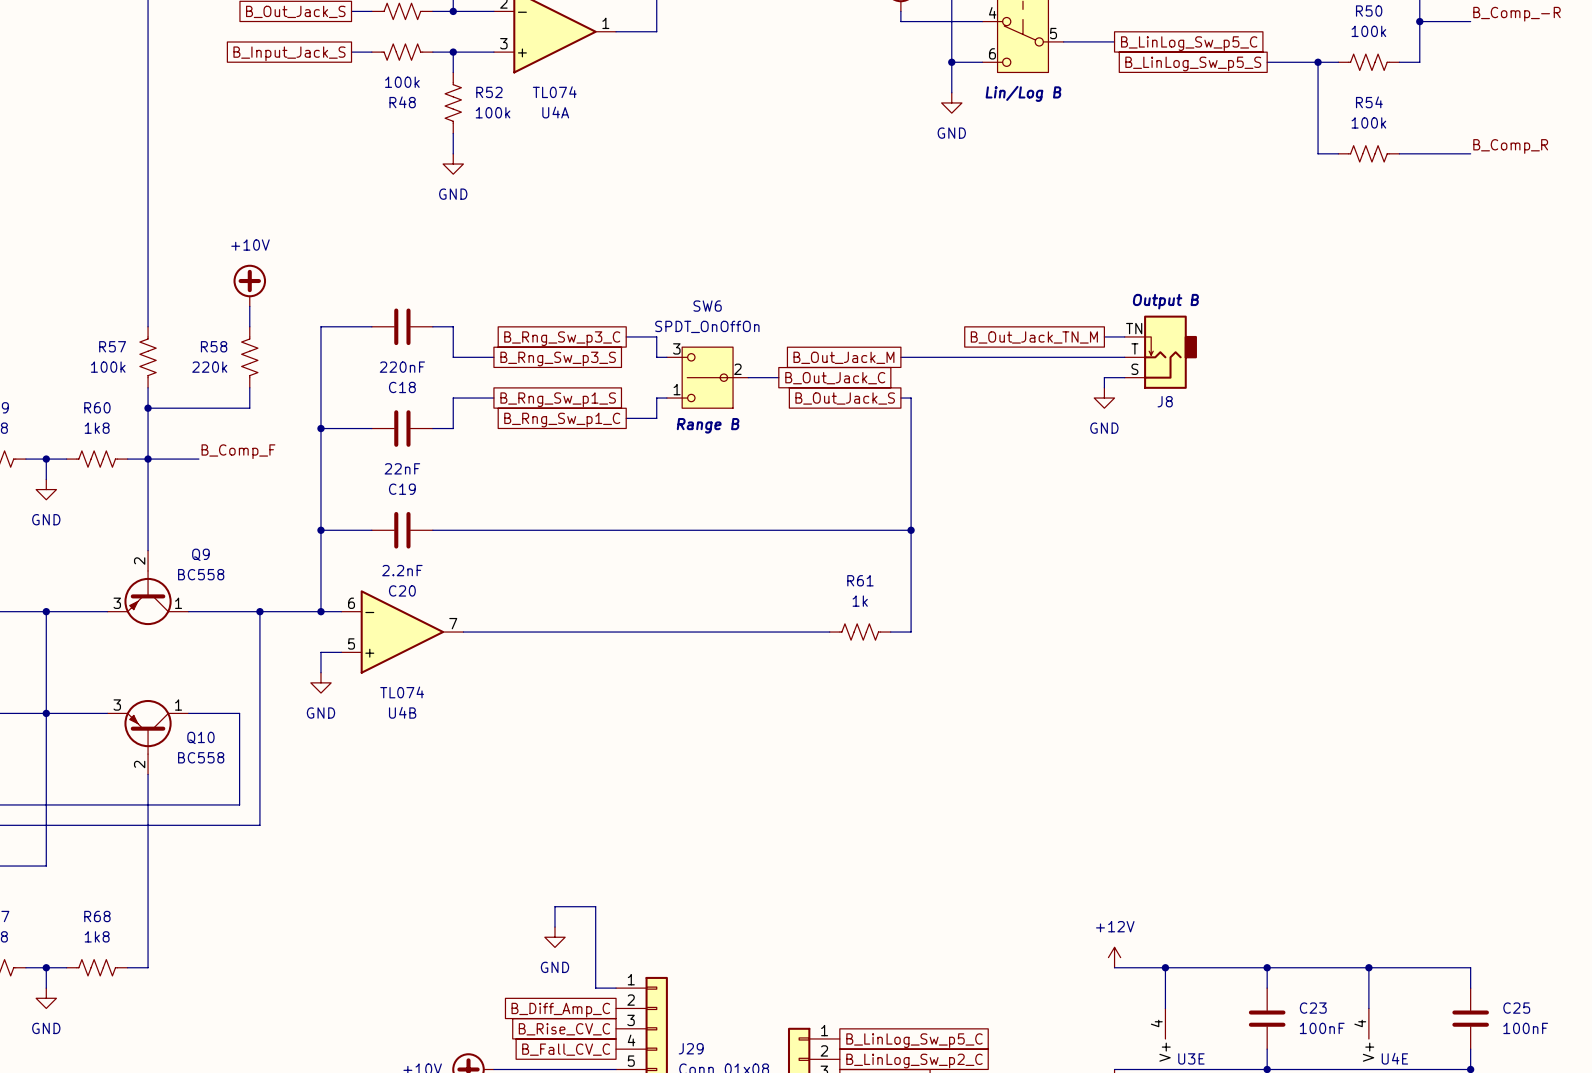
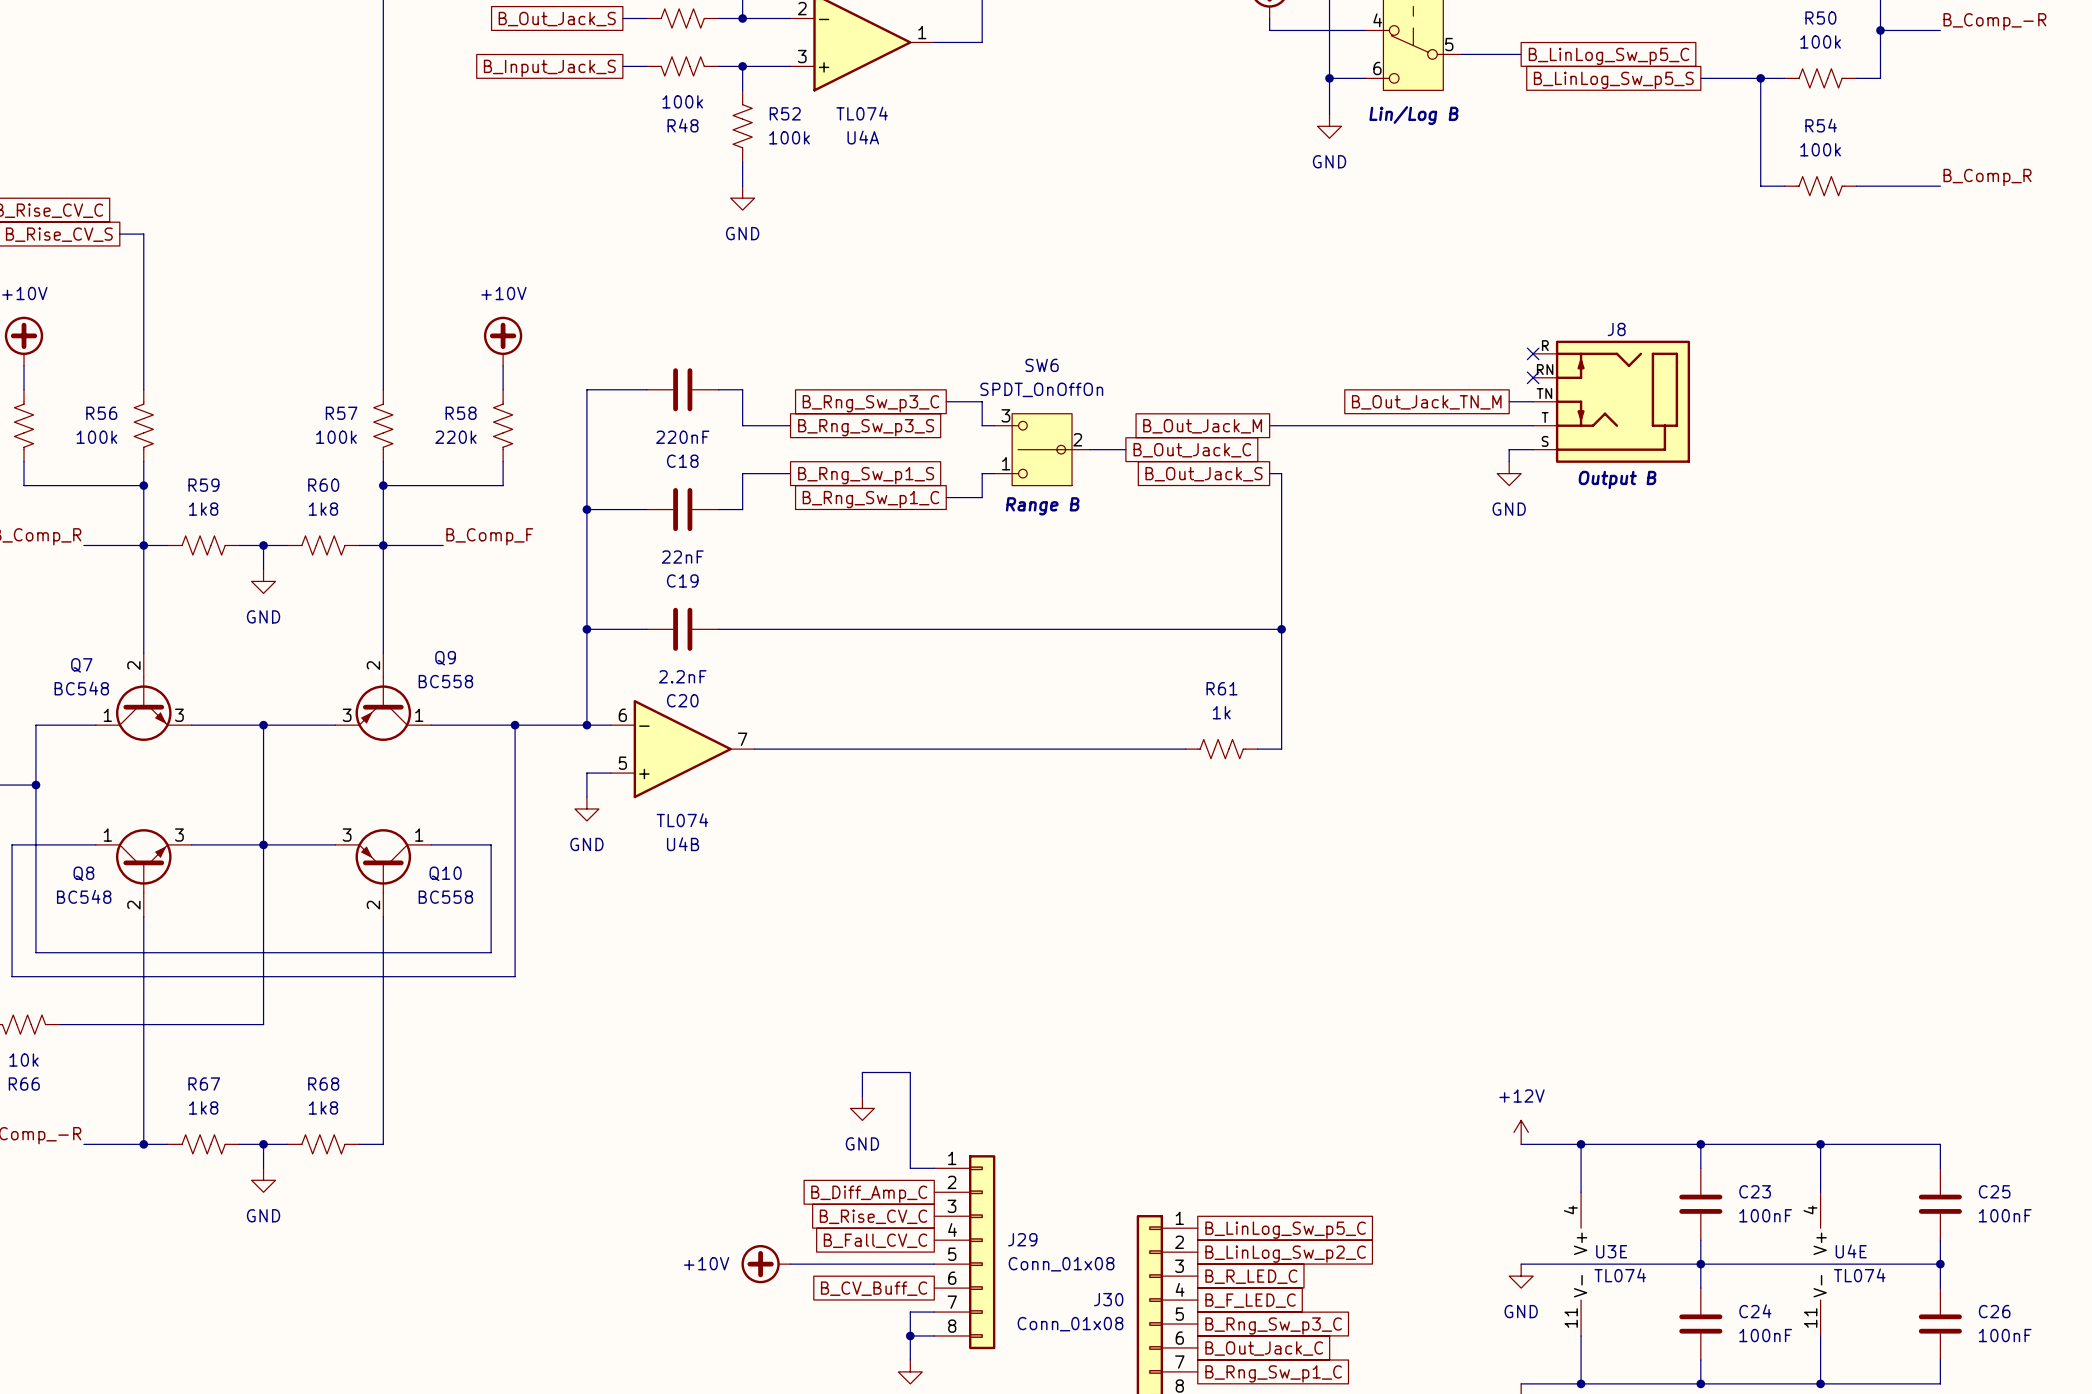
no-connect mark: none -> (1533, 353)
J8 text position: Output B (1165, 301) -> Output B (1617, 479)
J8 symbol: [1124, 315, 1197, 389] -> [1533, 340, 1691, 463]
no-connect mark: none -> (1533, 377)
J8 name position: J8 (1165, 401) -> J8 (1616, 329)

